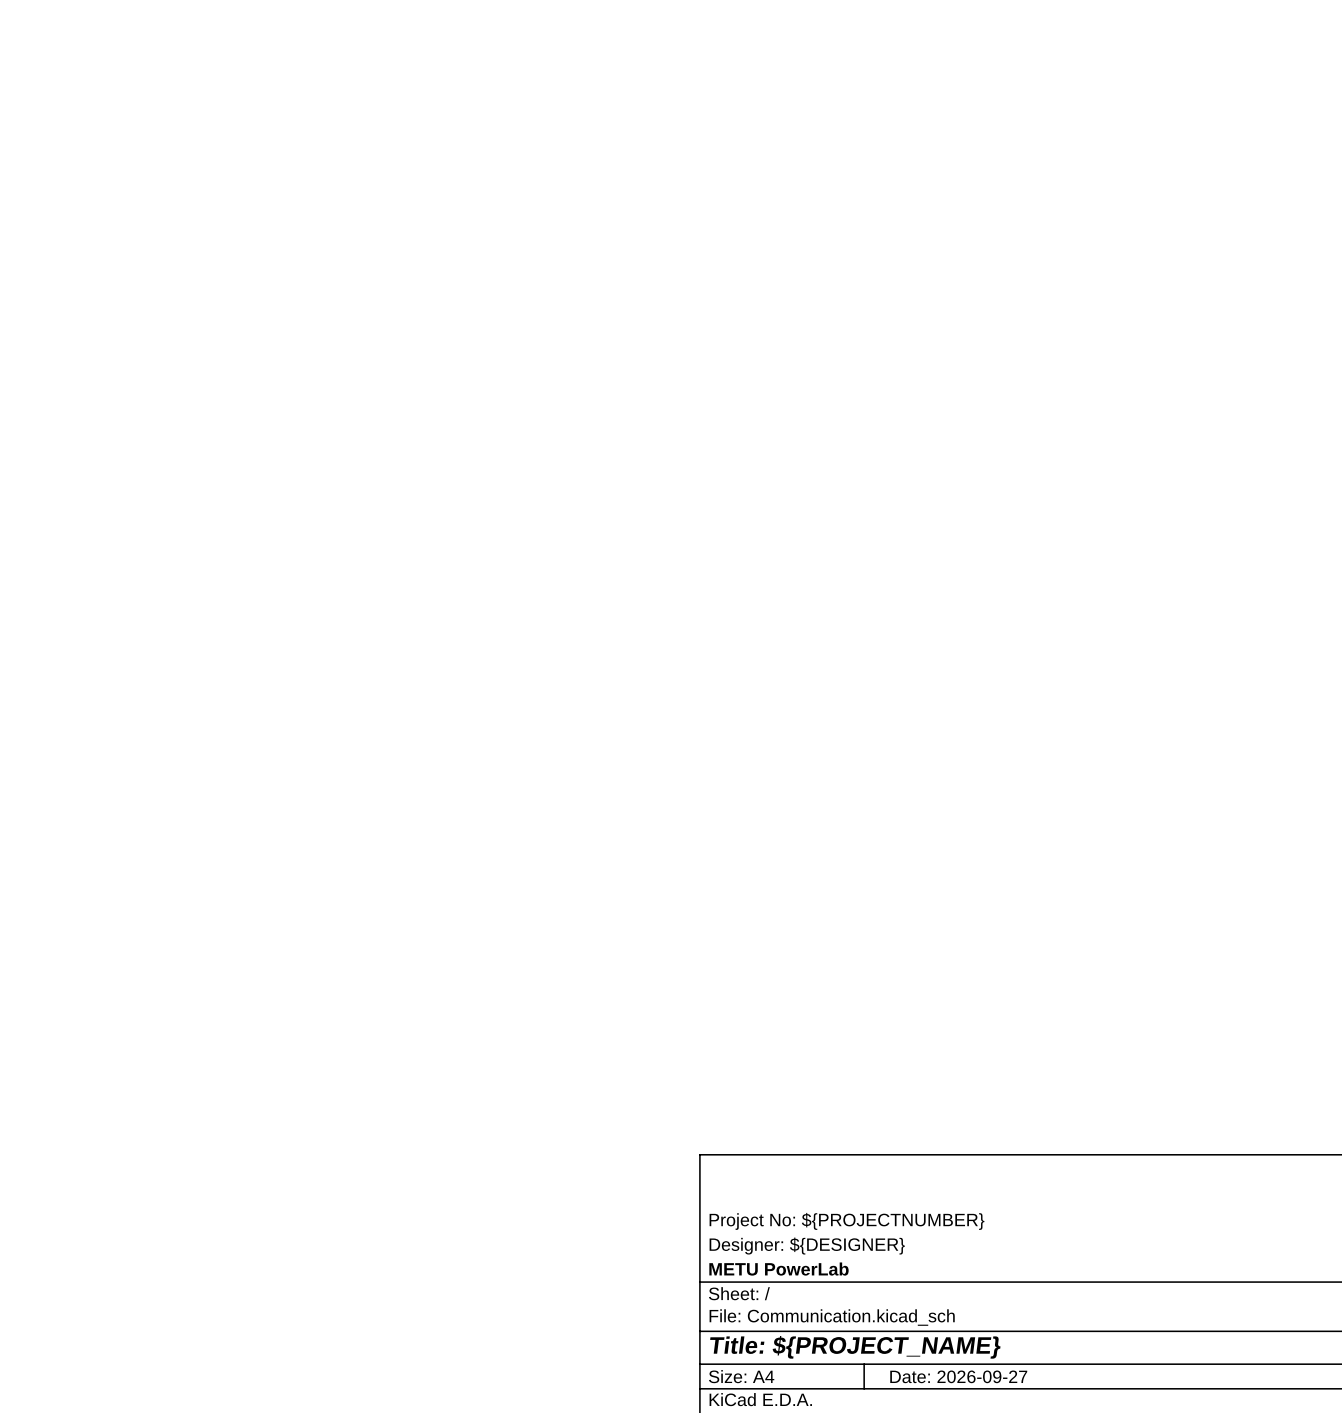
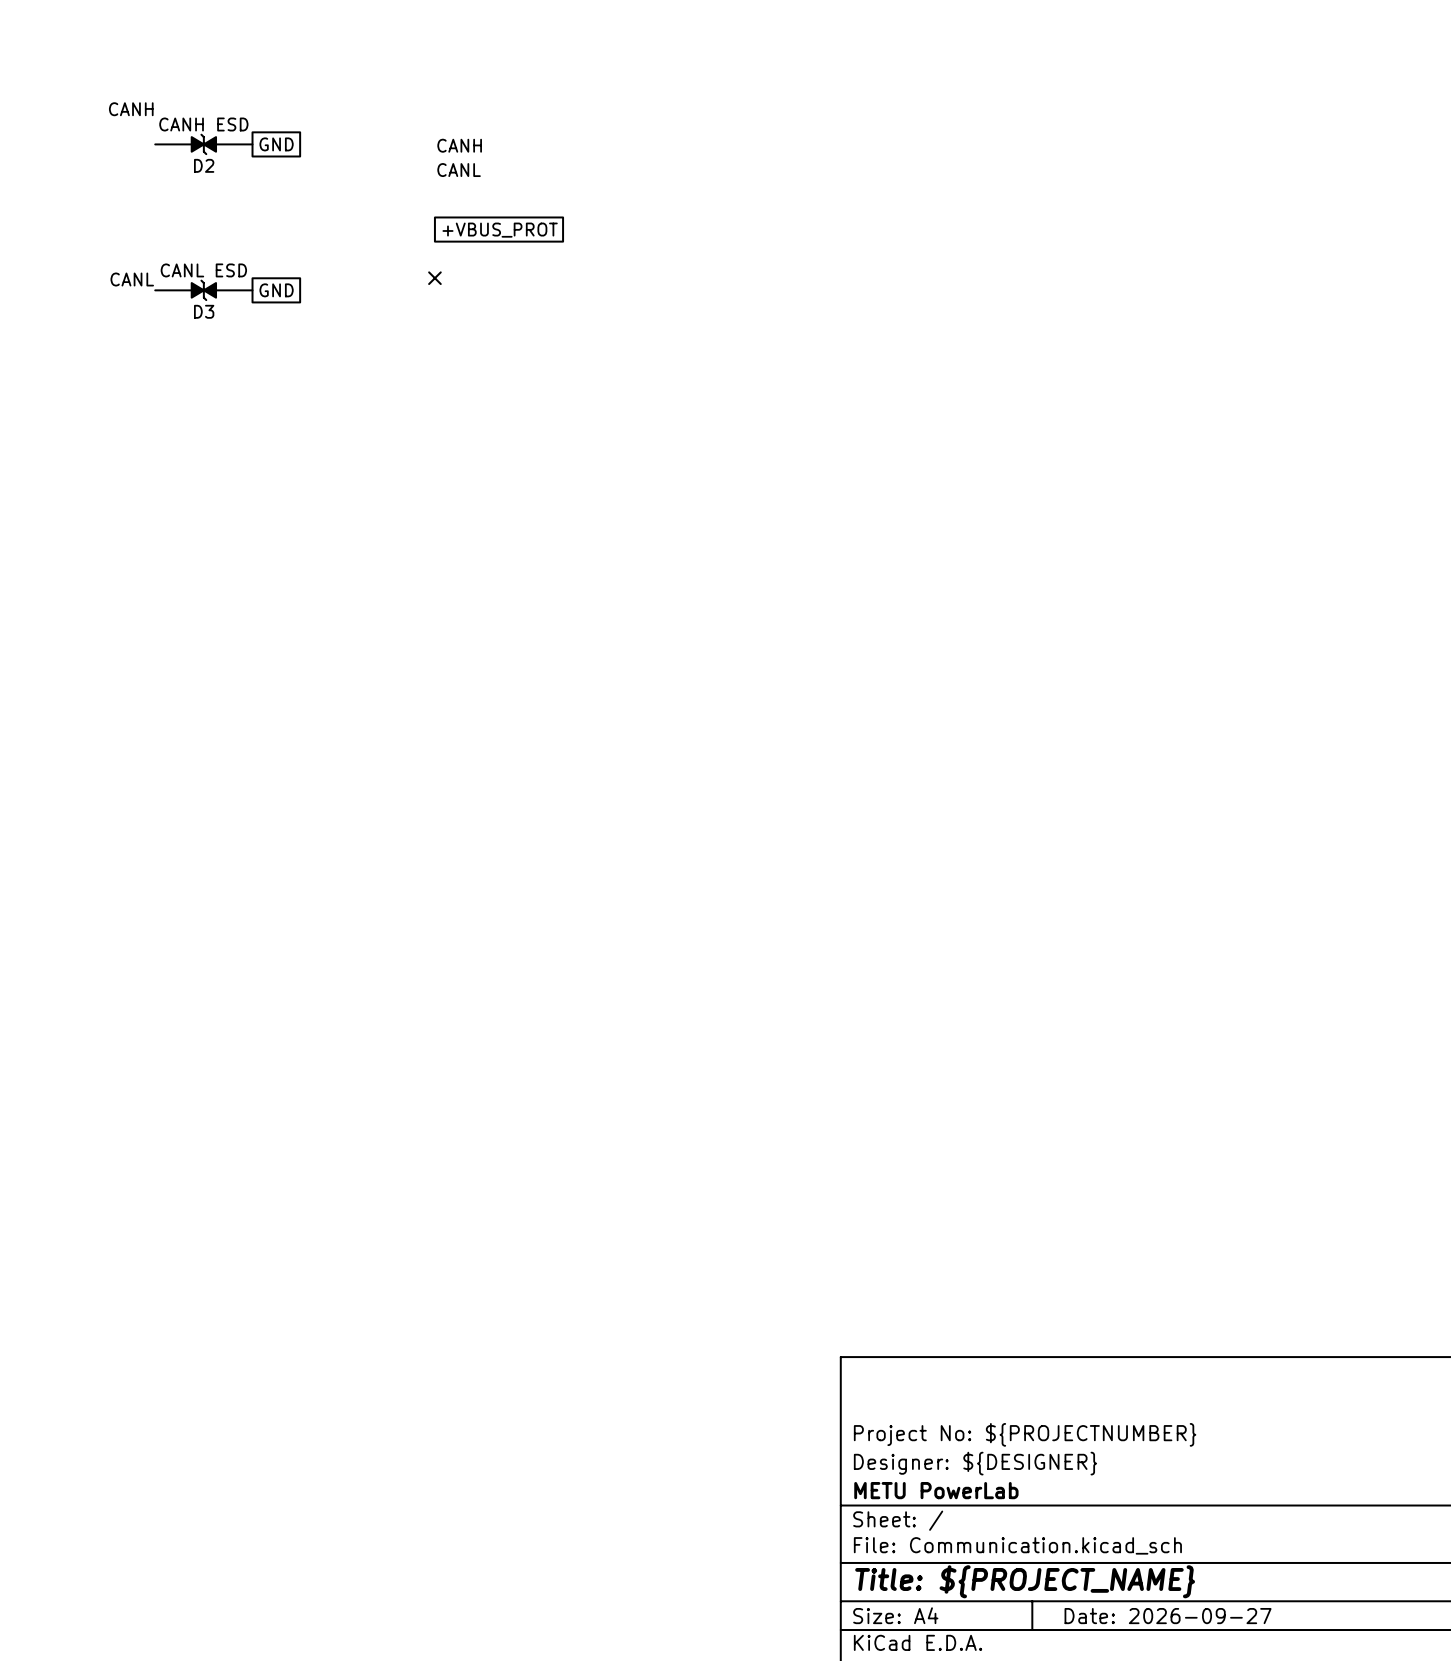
label: none -> CANH (131, 109)
D2: none -> CANH ESD (203, 144)
global label: none -> GND (276, 144)
label: none -> CANH (459, 145)
label: none -> CANL (459, 170)
global label: none -> +VBUS_PROT (500, 230)
no-connect mark: none -> (434, 278)
label: none -> CANL (132, 279)
D3: none -> CANL ESD (203, 290)
global label: none -> GND (276, 290)

